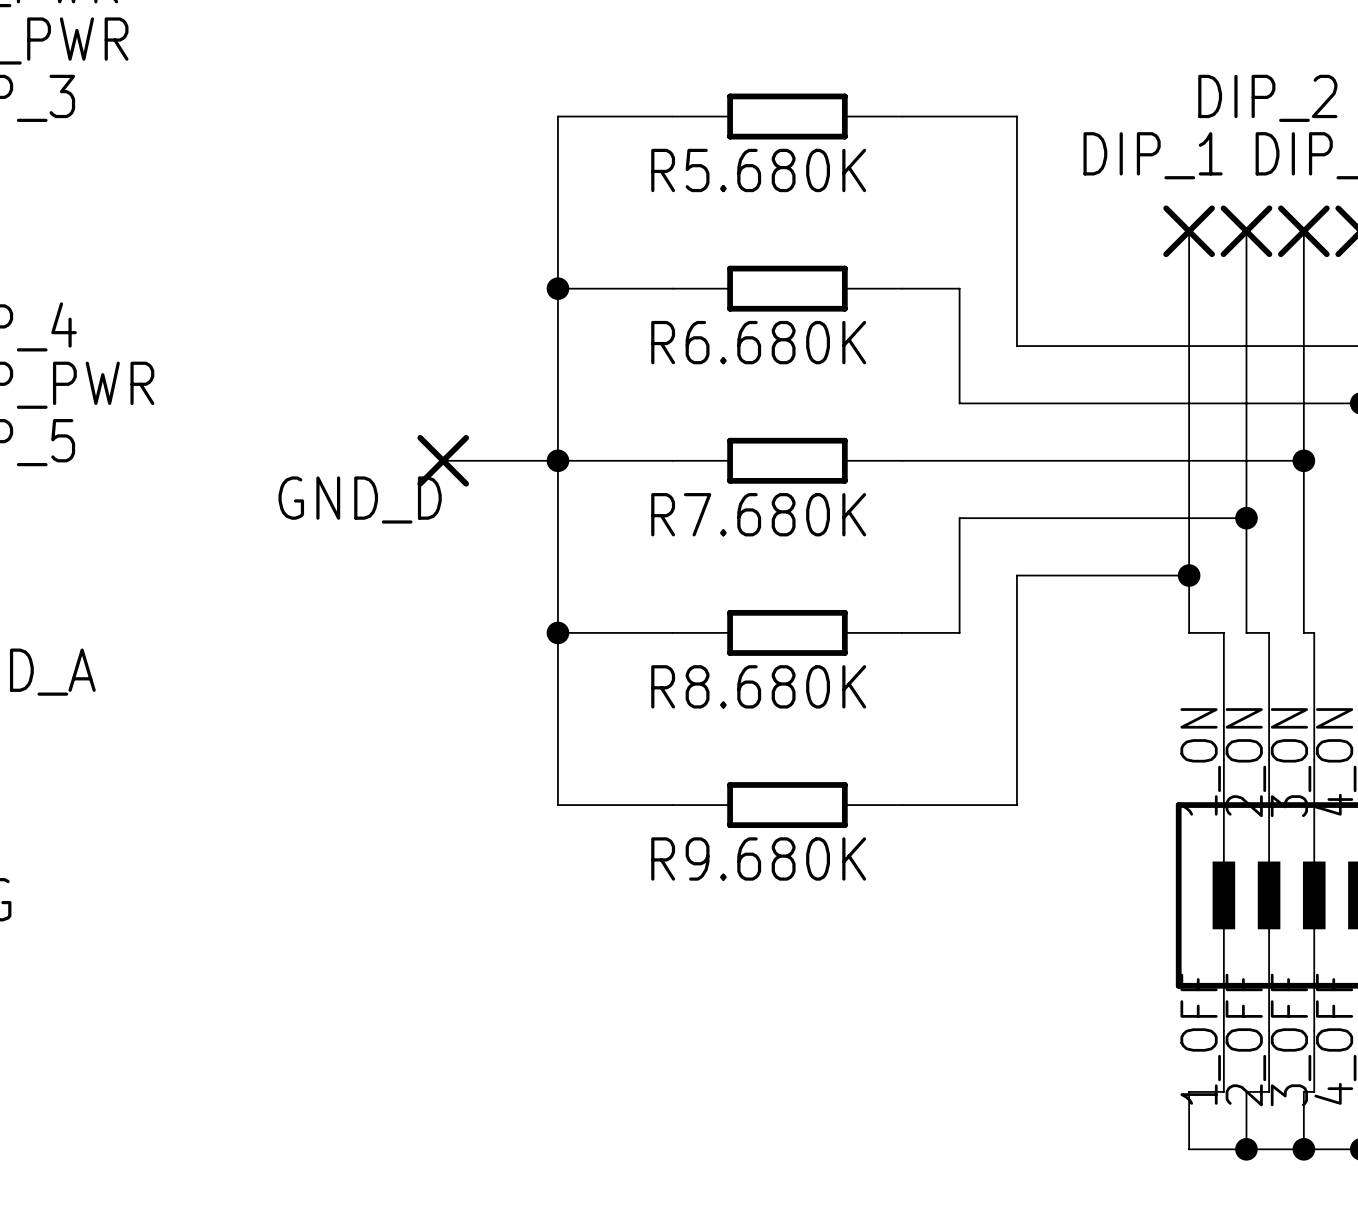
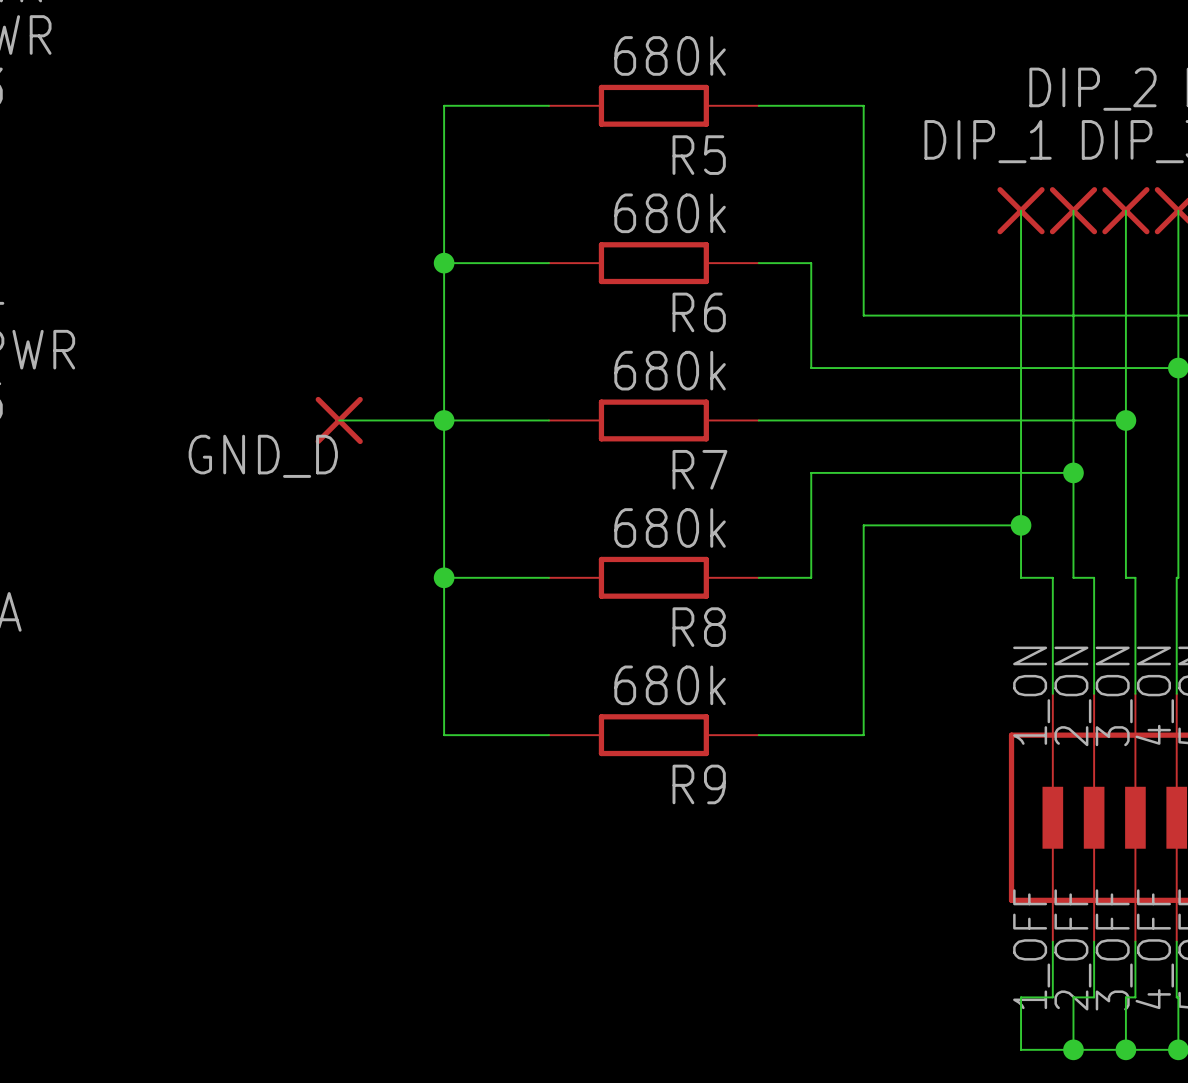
R5.680K value: none -> 680k (670, 55)
R5.680K name: R5.680K (758, 170) -> R5 (699, 155)
R6.680K value: none -> 680k (670, 213)
R6.680K name: R6.680K (758, 342) -> R6 (699, 312)
R7.680K value: none -> 680k (670, 370)
R7.680K name: R7.680K (758, 514) -> R7 (699, 469)
R8.680K value: none -> 680k (670, 527)
R8.680K name: R8.680K (758, 686) -> R8 (699, 627)
R9.680K value: none -> 680k (670, 685)
R9.680K name: R9.680K (758, 858) -> R9 (699, 784)

